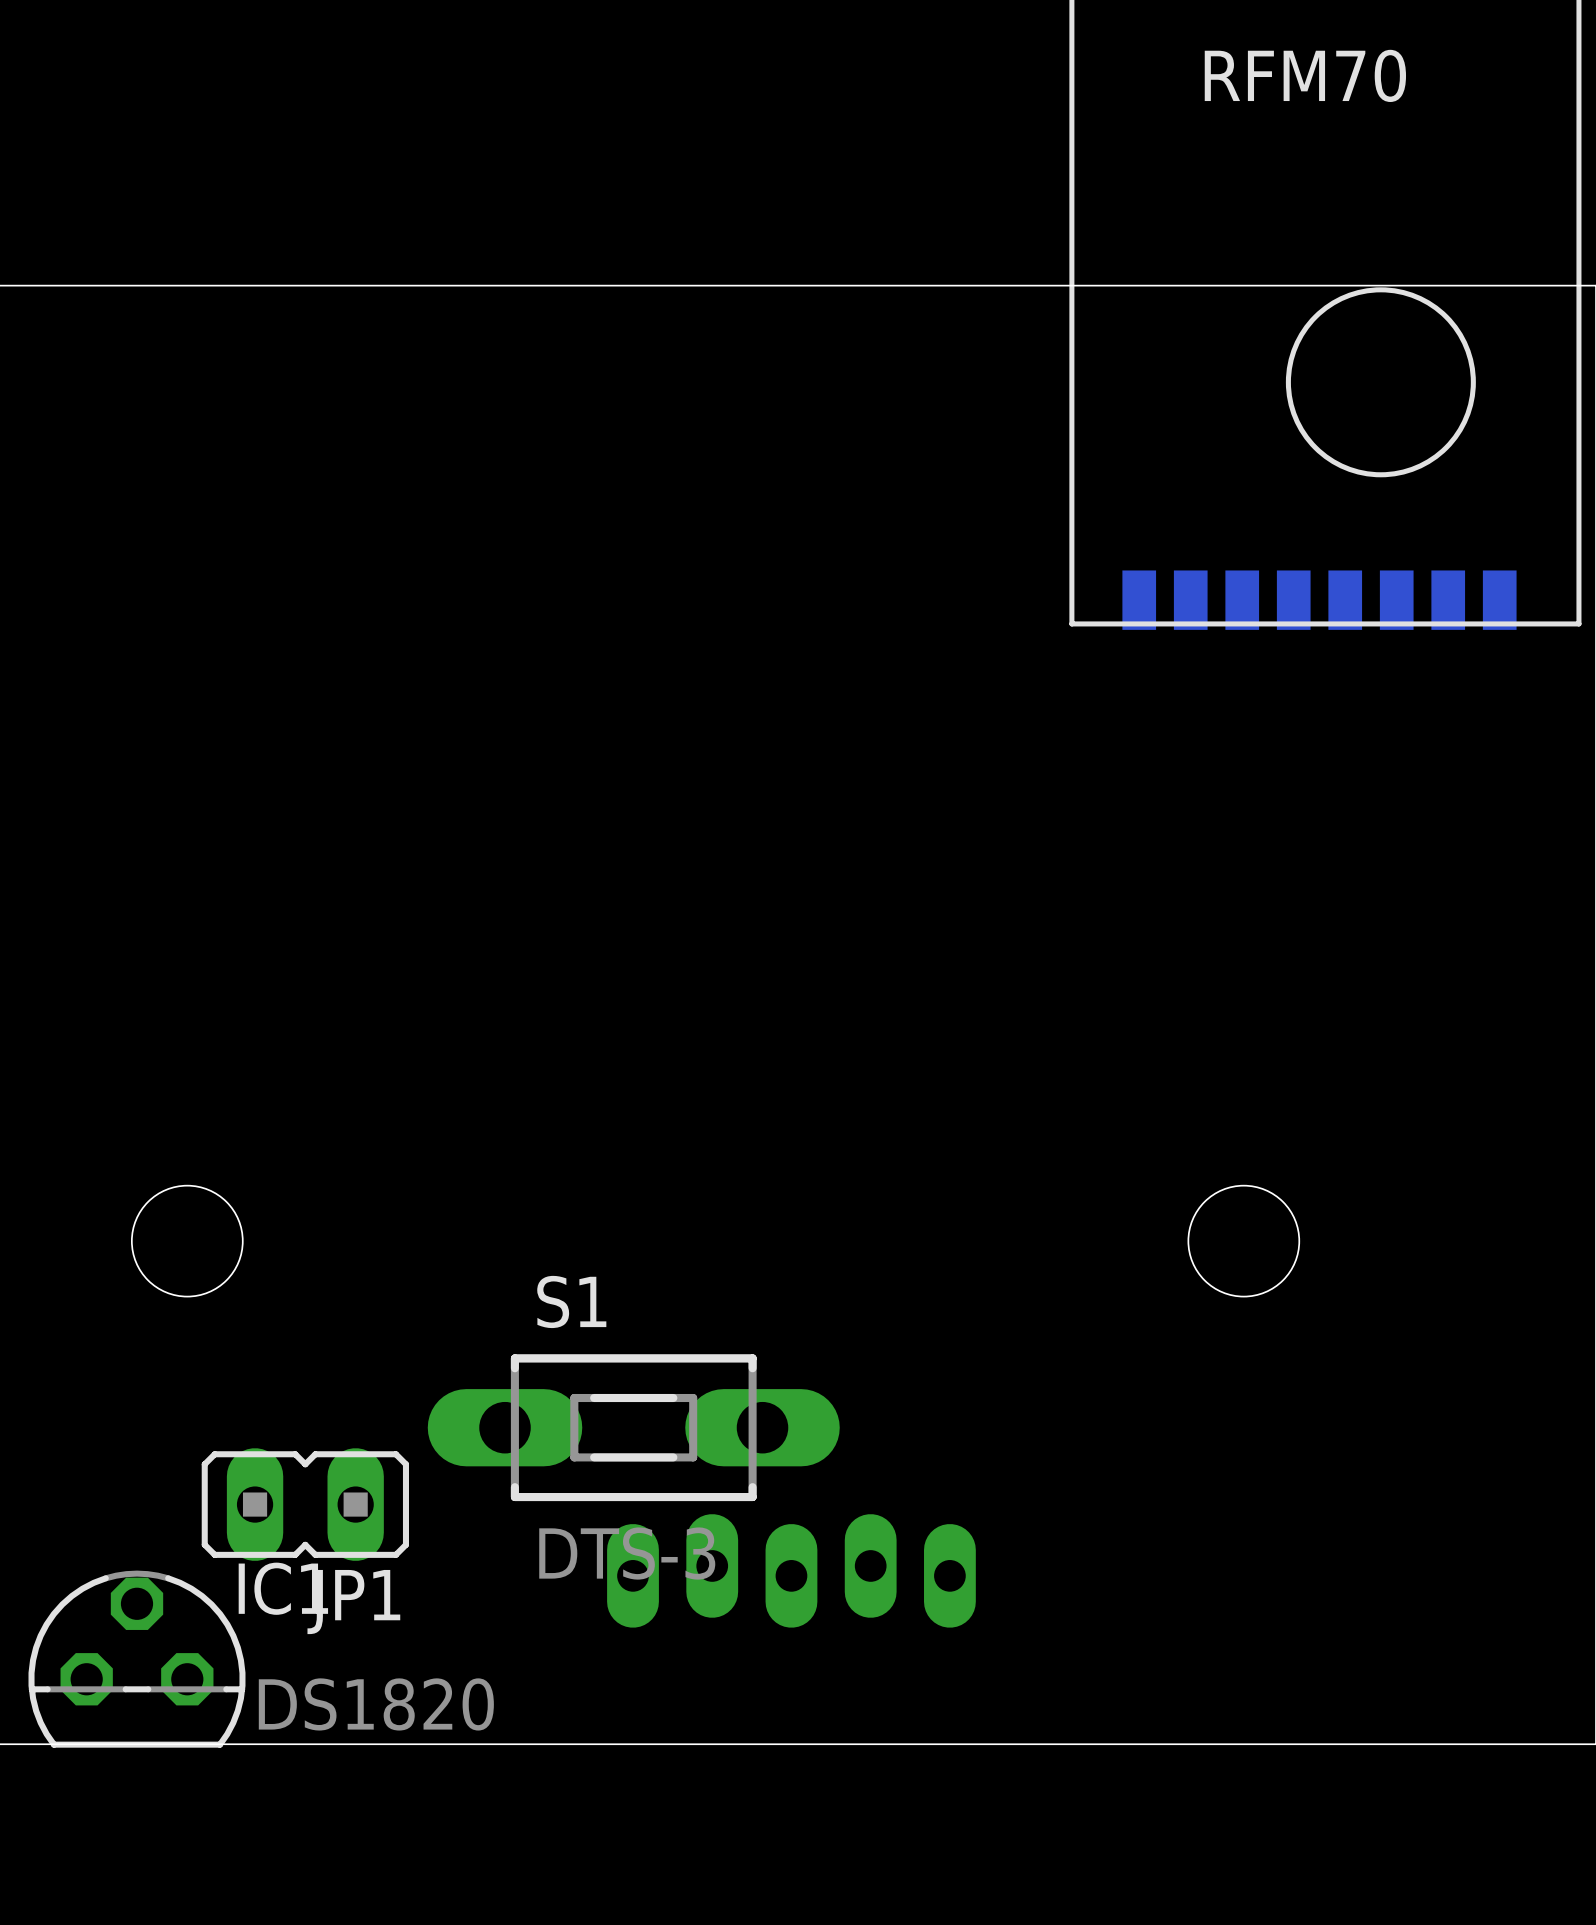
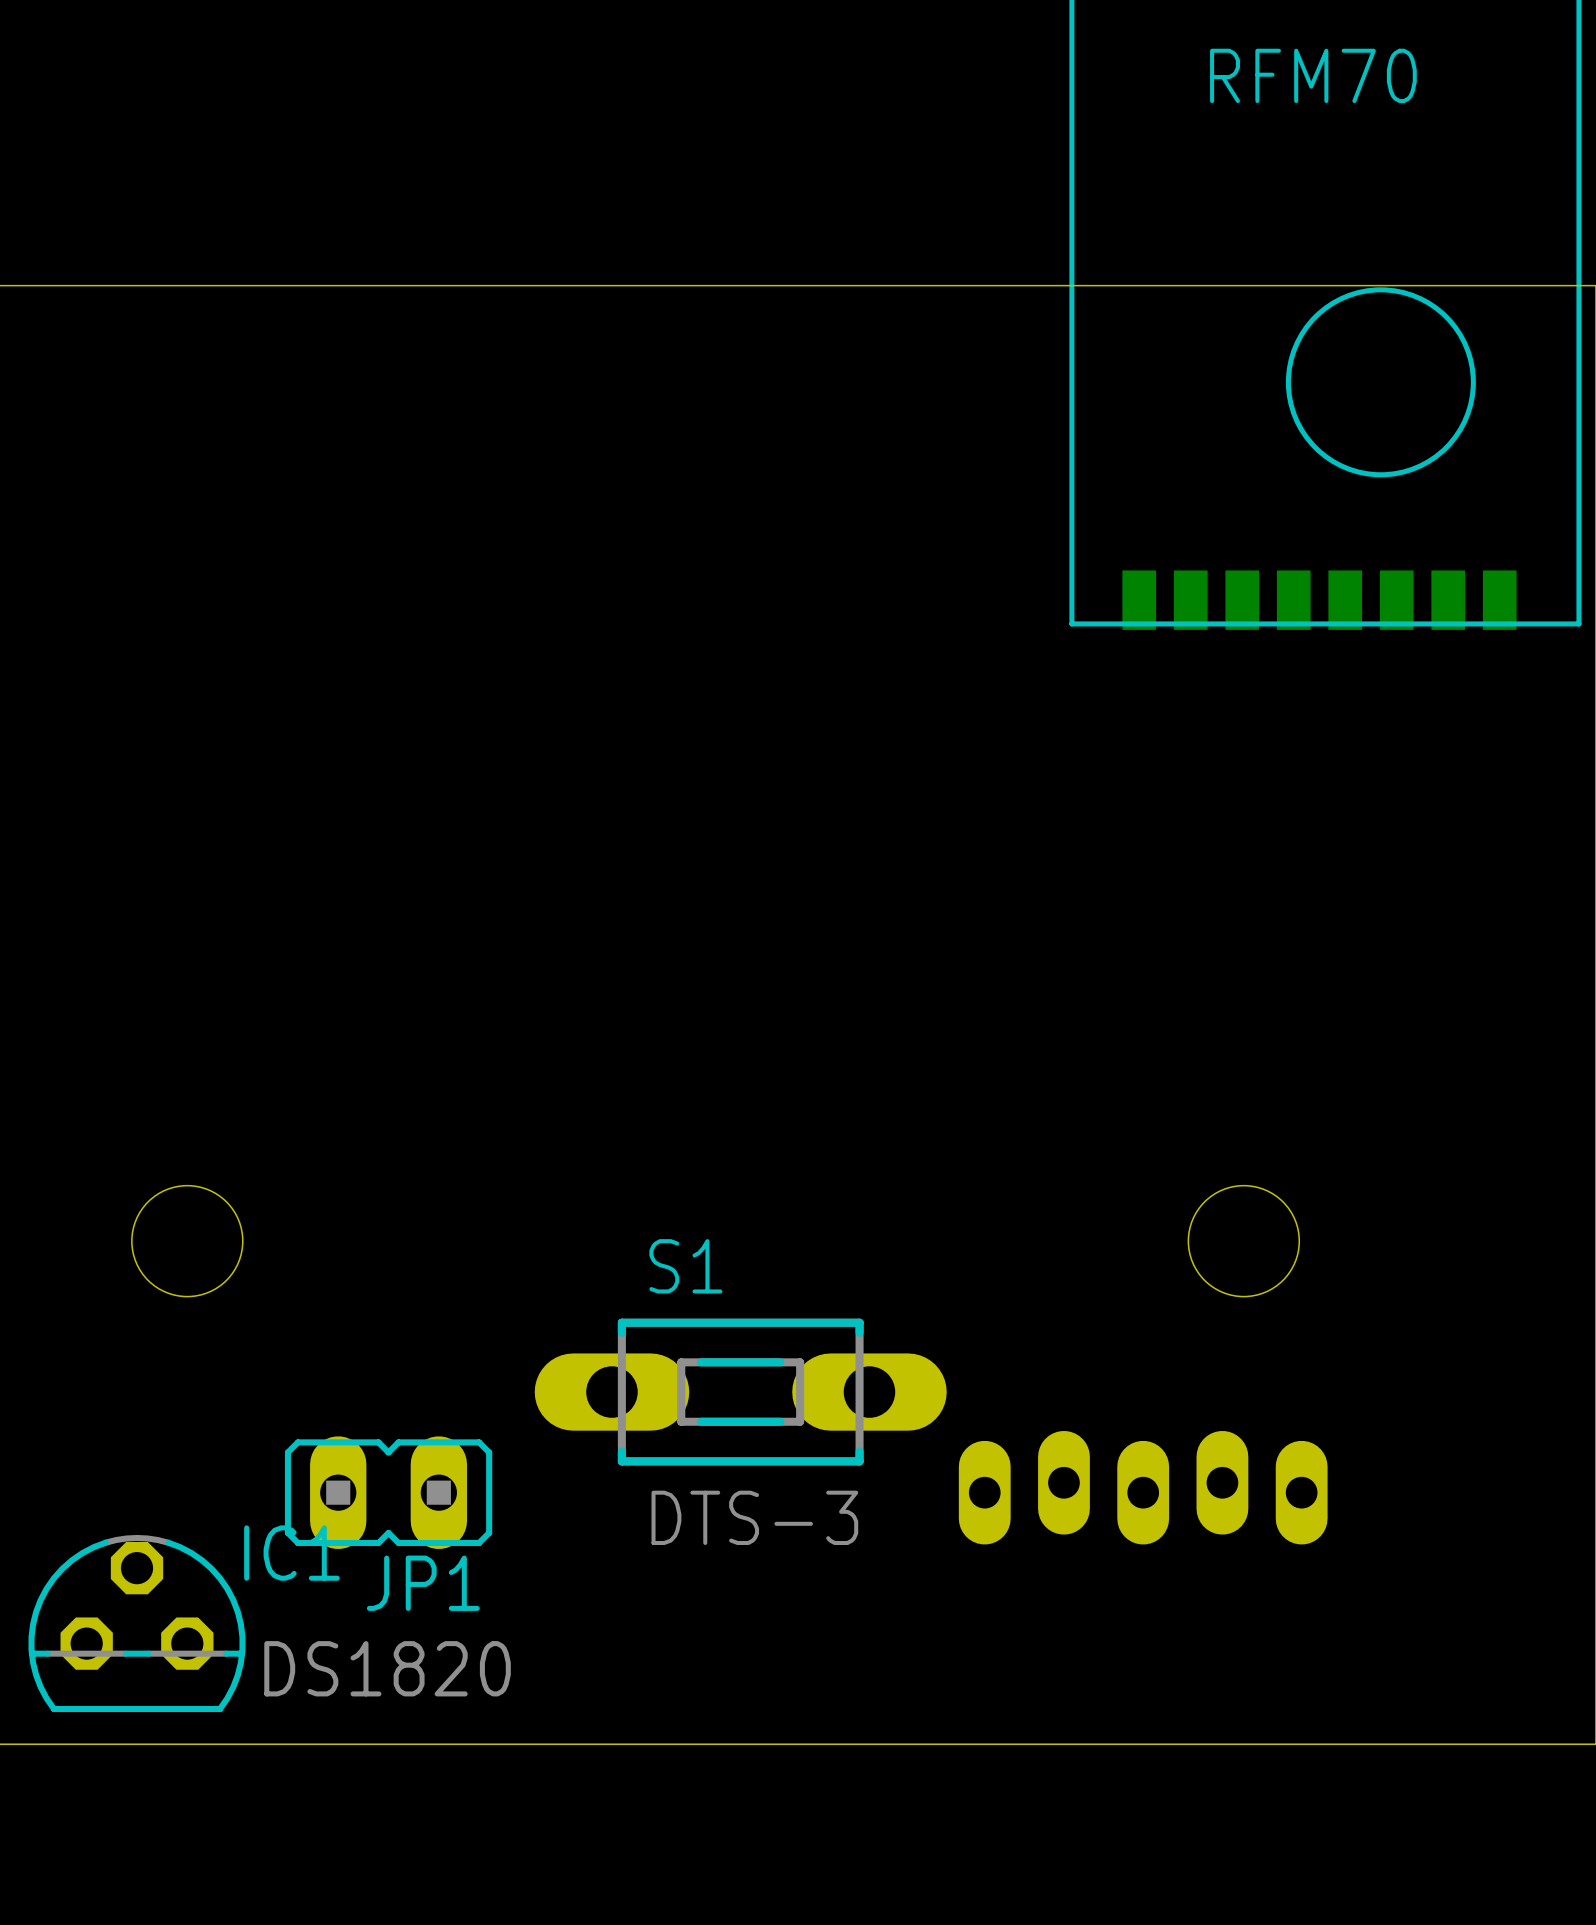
S1 position: (633, 1427) -> (740, 1392)
JP1 position: (305, 1504) -> (388, 1492)
part position: (791, 1570) -> (1143, 1487)
IC1 position: (137, 1659) -> (137, 1623)

